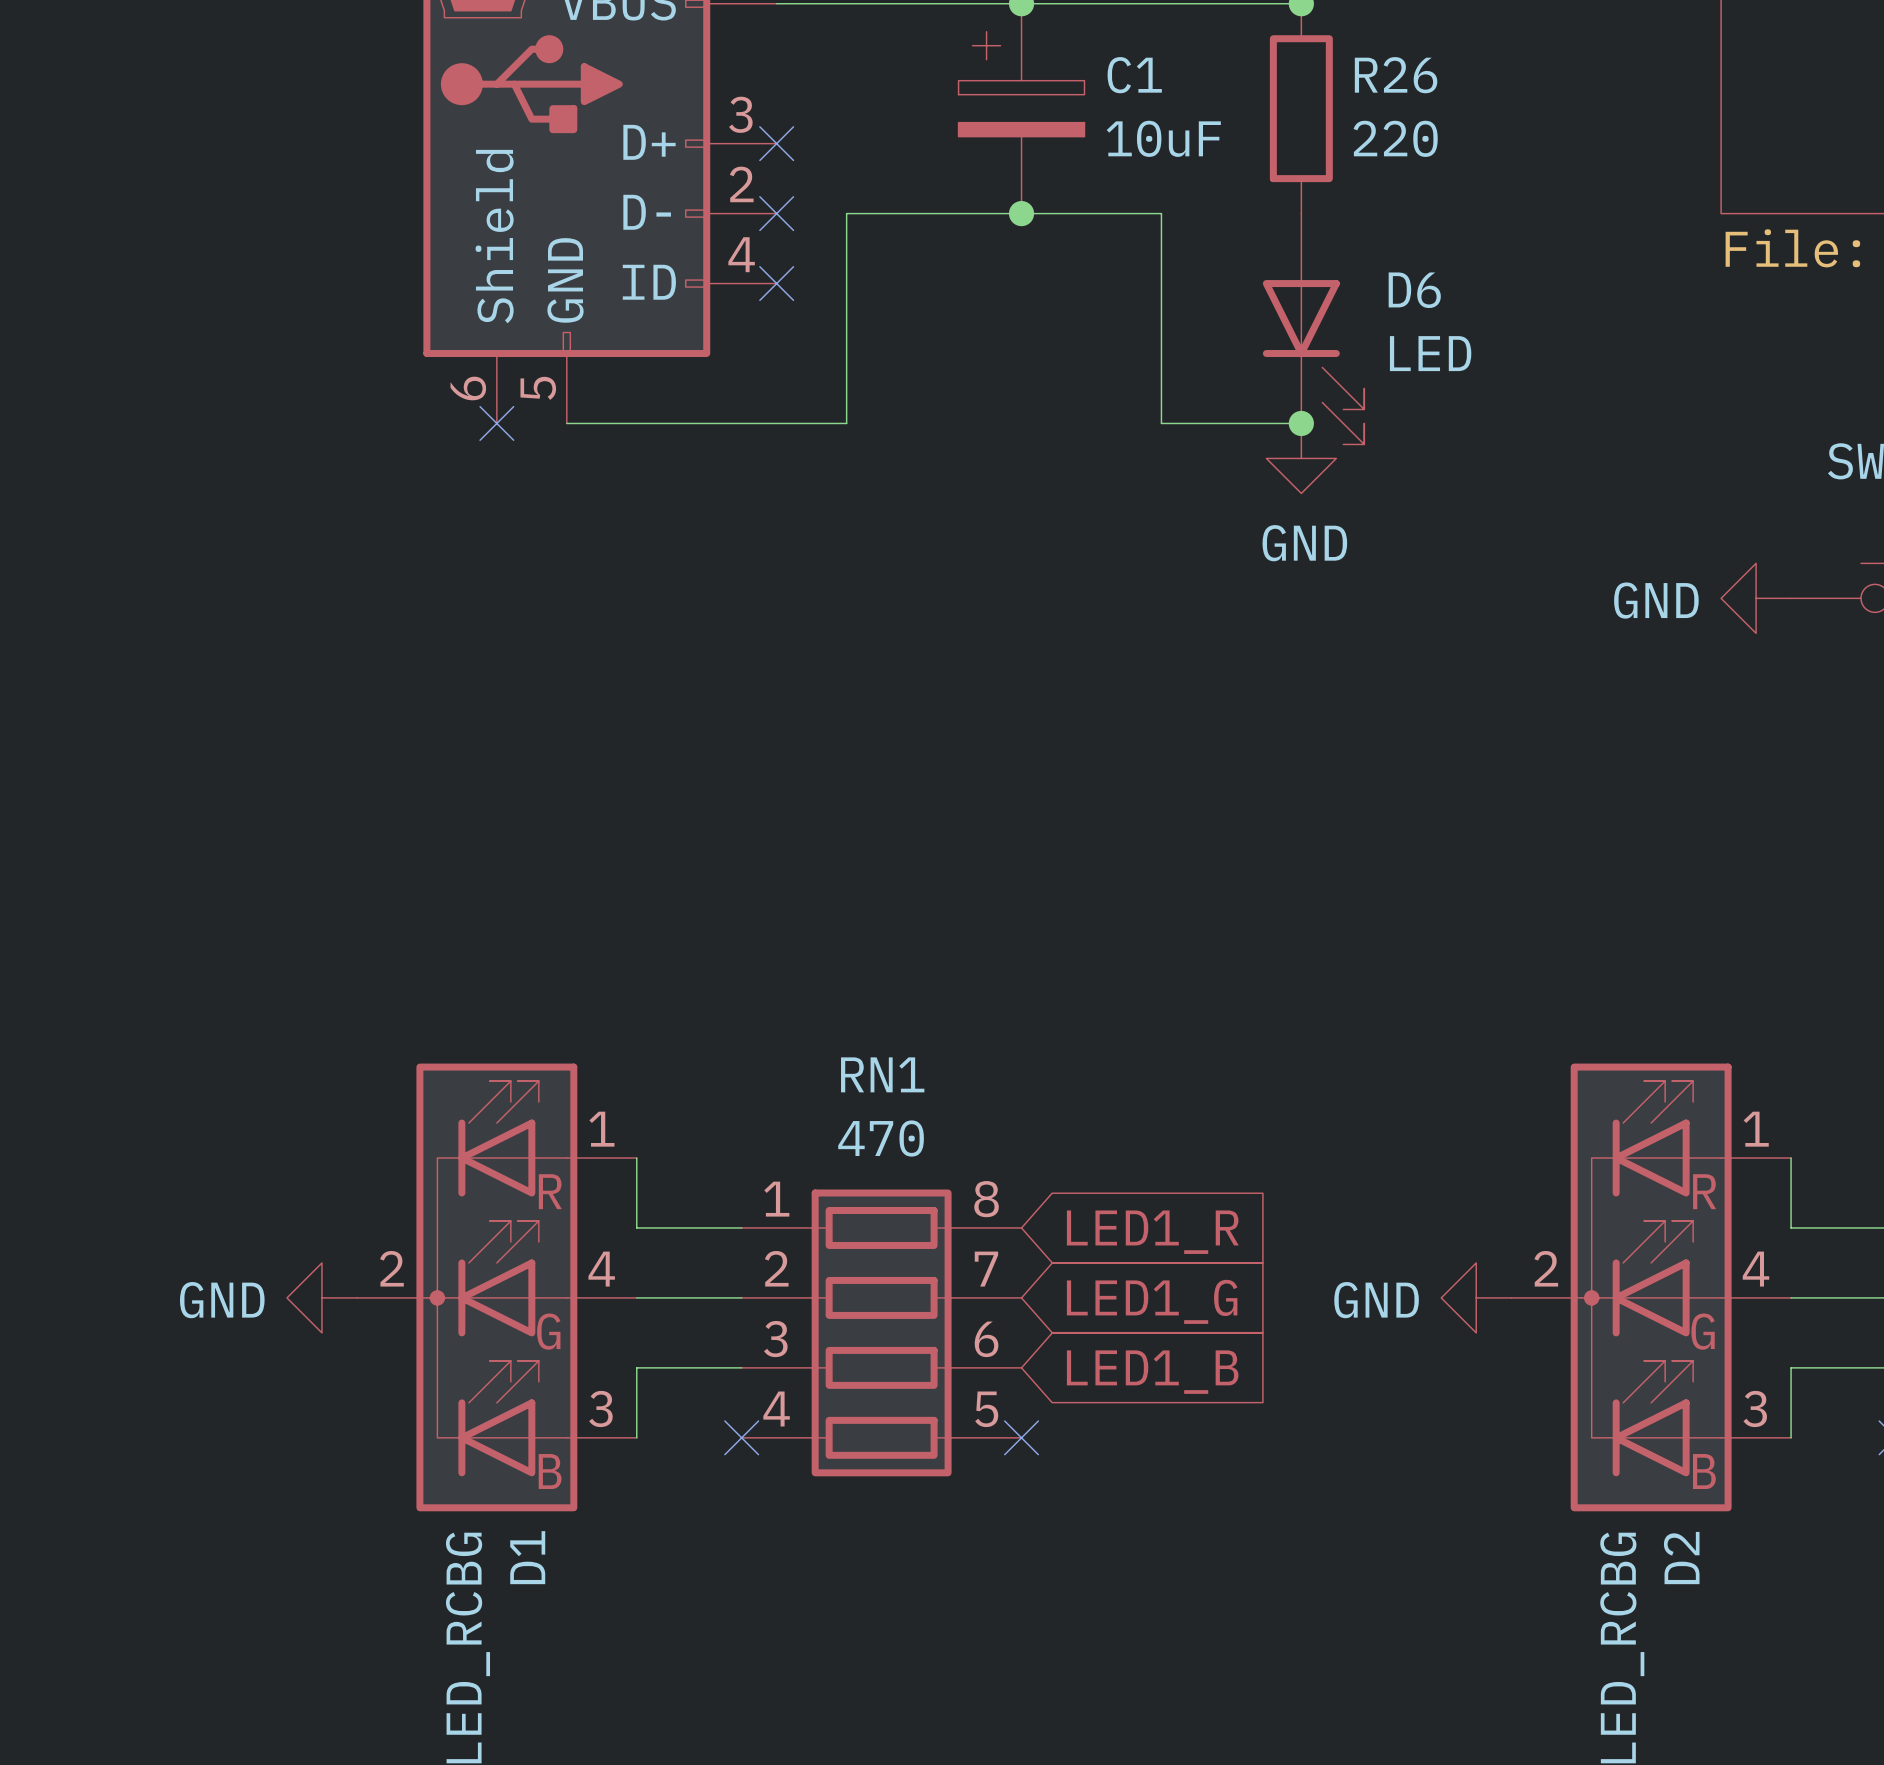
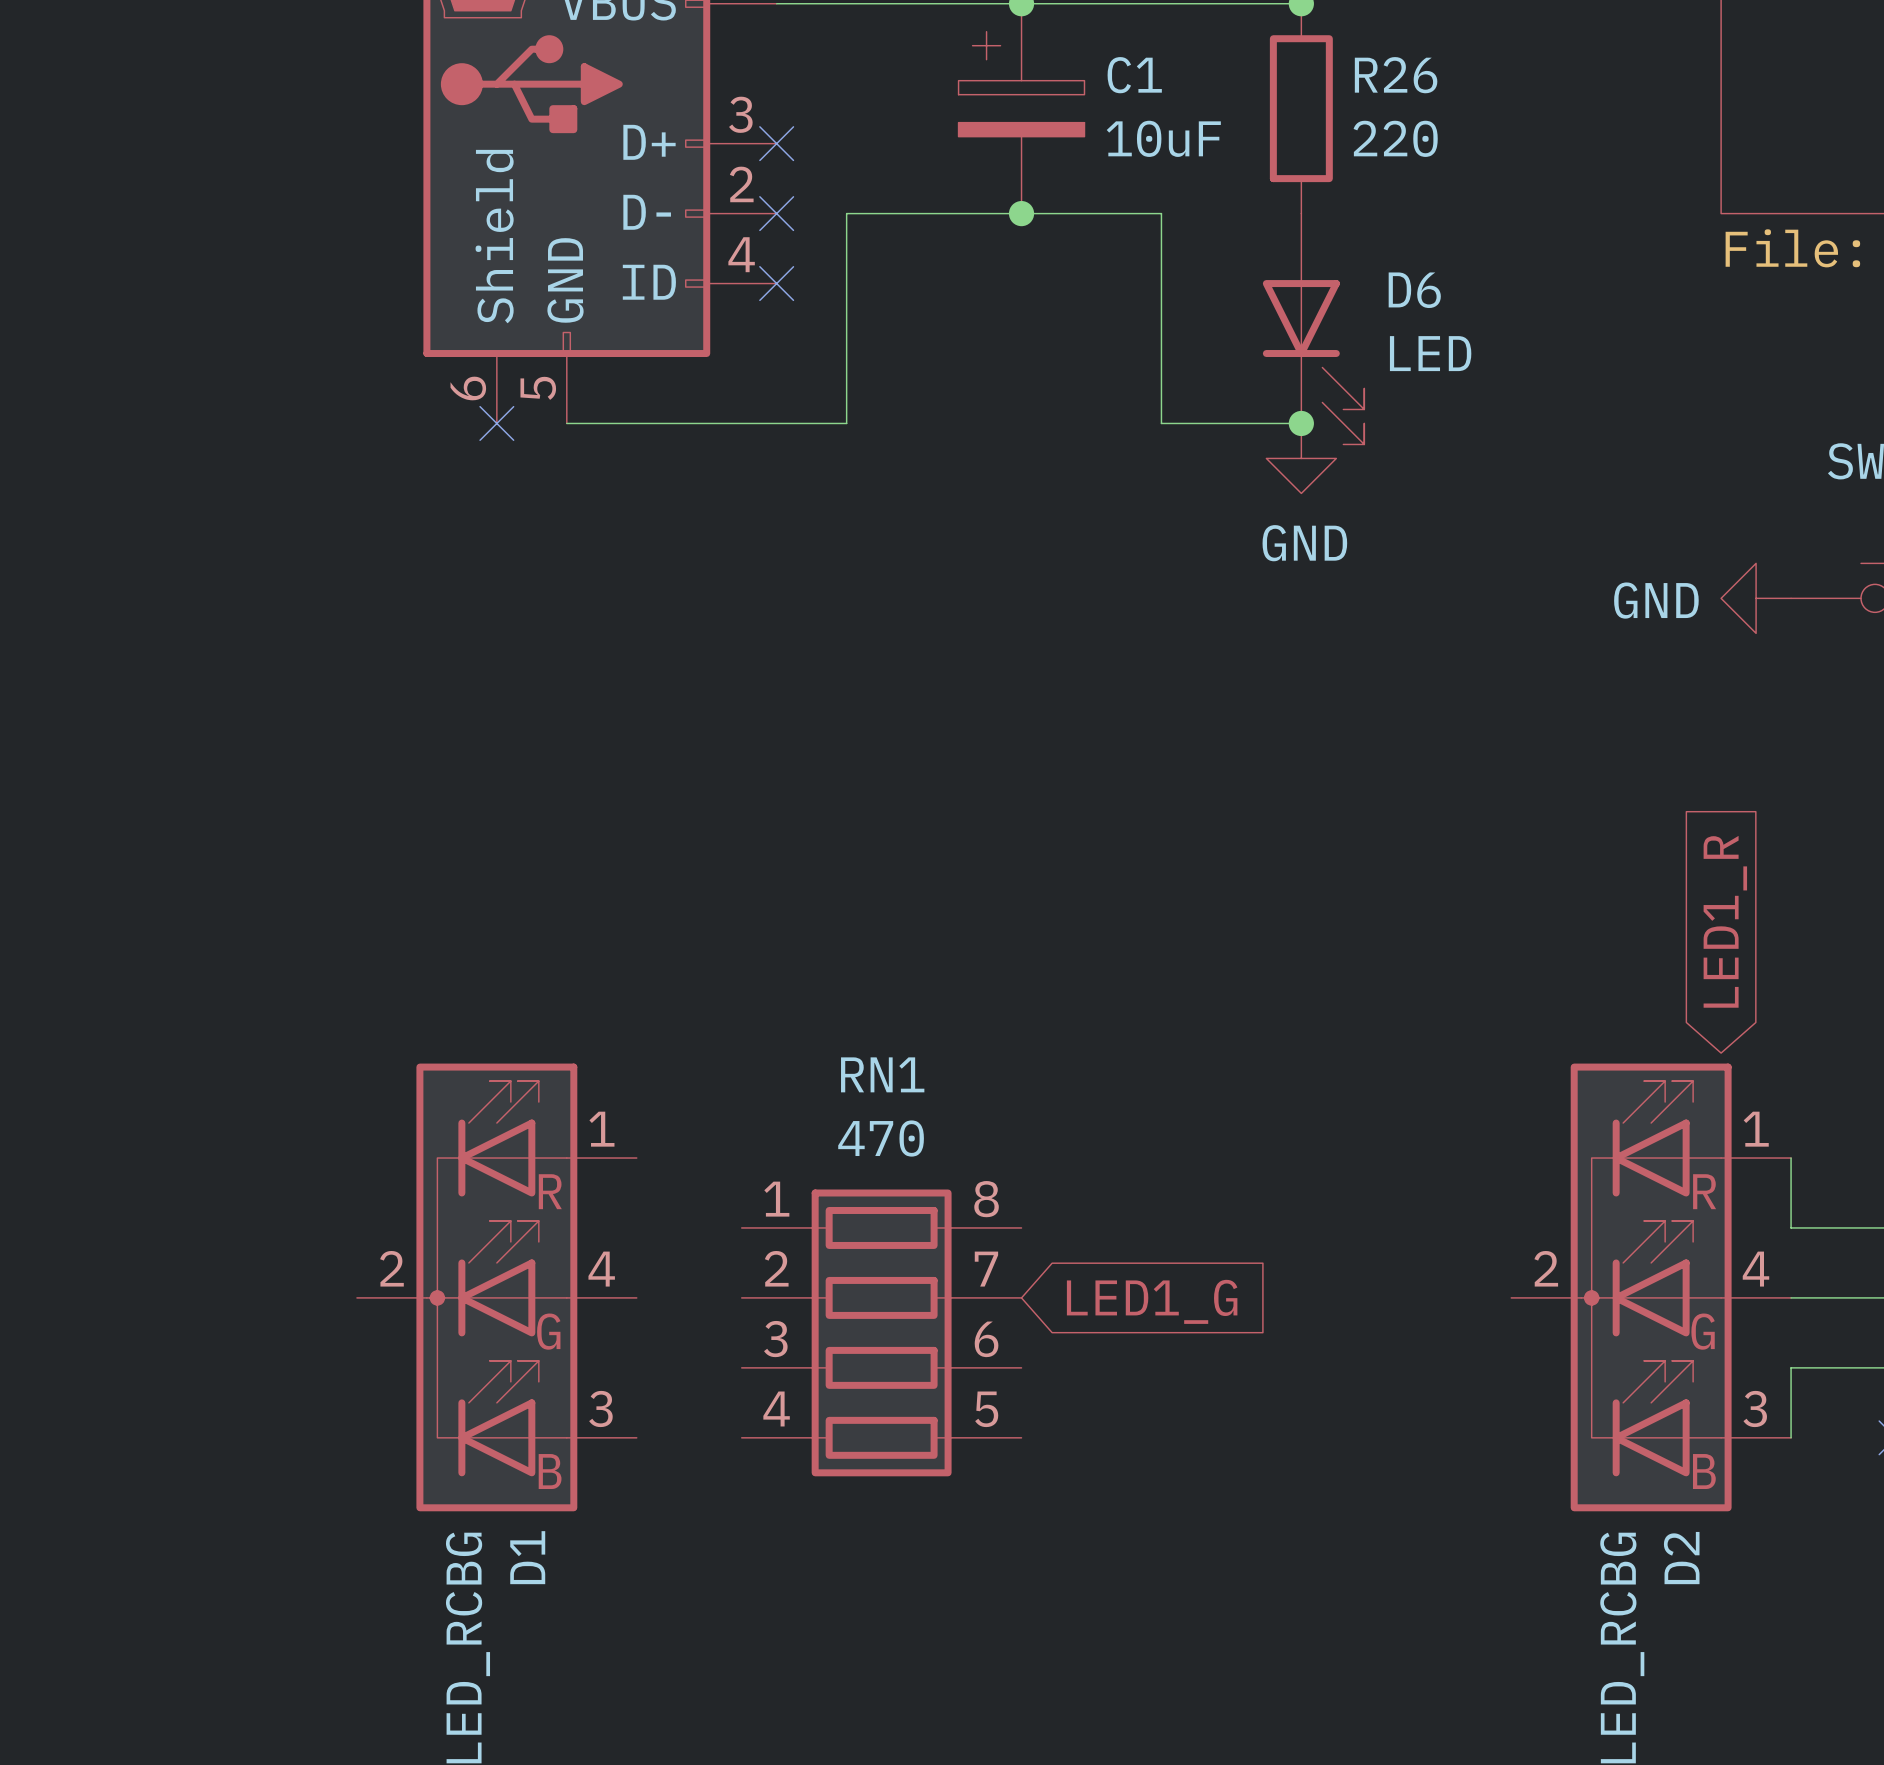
global label: none -> LED1_R (1725, 921)
wire: (636, 1158) (636, 1227) (741, 1227) -> none
global label: LED1_R (1152, 1232) -> none
power symbol: GND (321, 1297) -> none
wire: (636, 1297) (741, 1297) -> none
power symbol: GND (1476, 1297) -> none
wire: (741, 1367) (636, 1367) (636, 1437) -> none
global label: LED1_B (1152, 1372) -> none
no-connect mark: (741, 1437) -> none
no-connect mark: (1021, 1437) -> none

